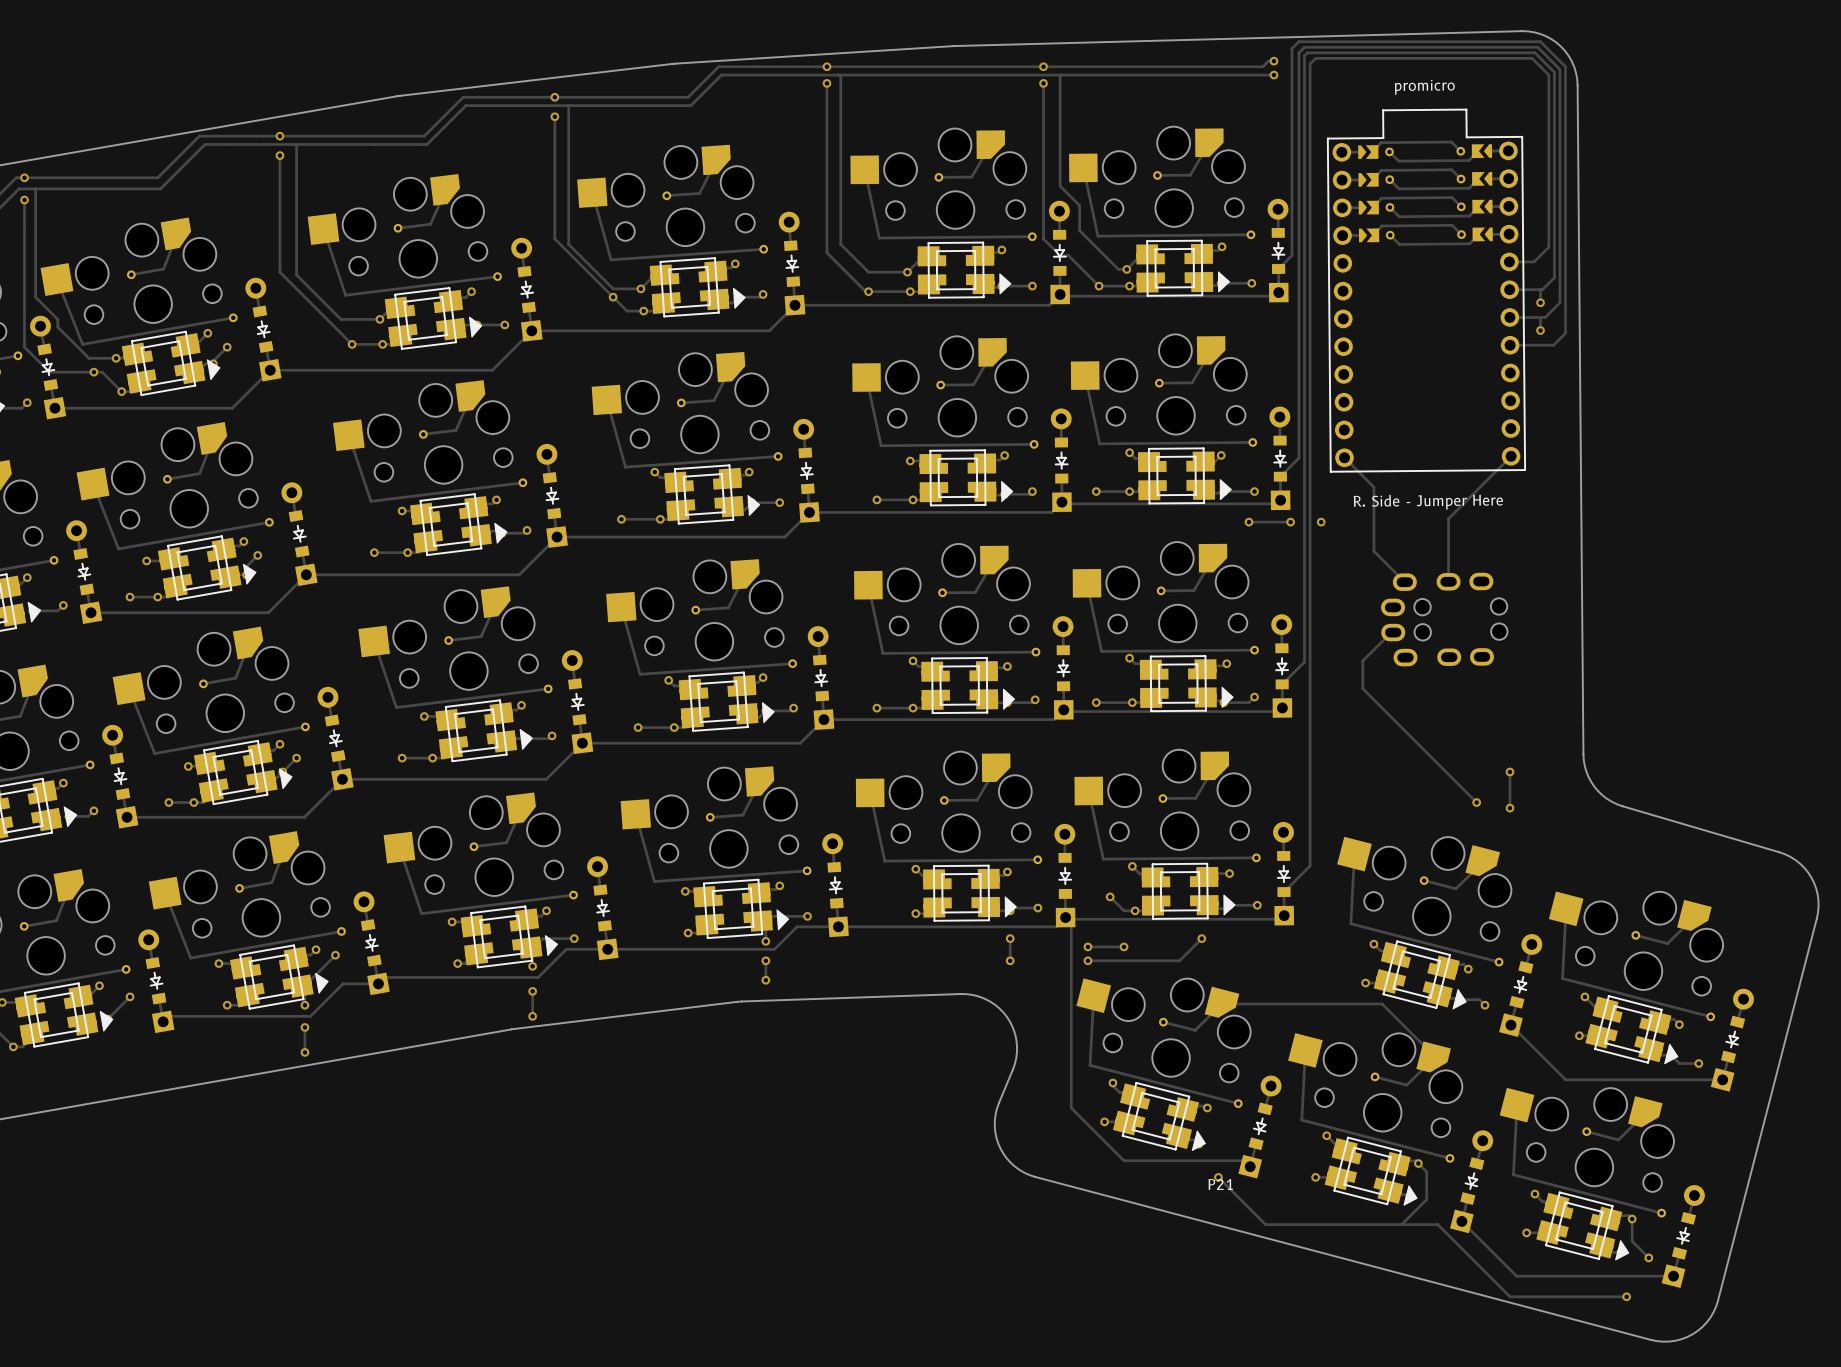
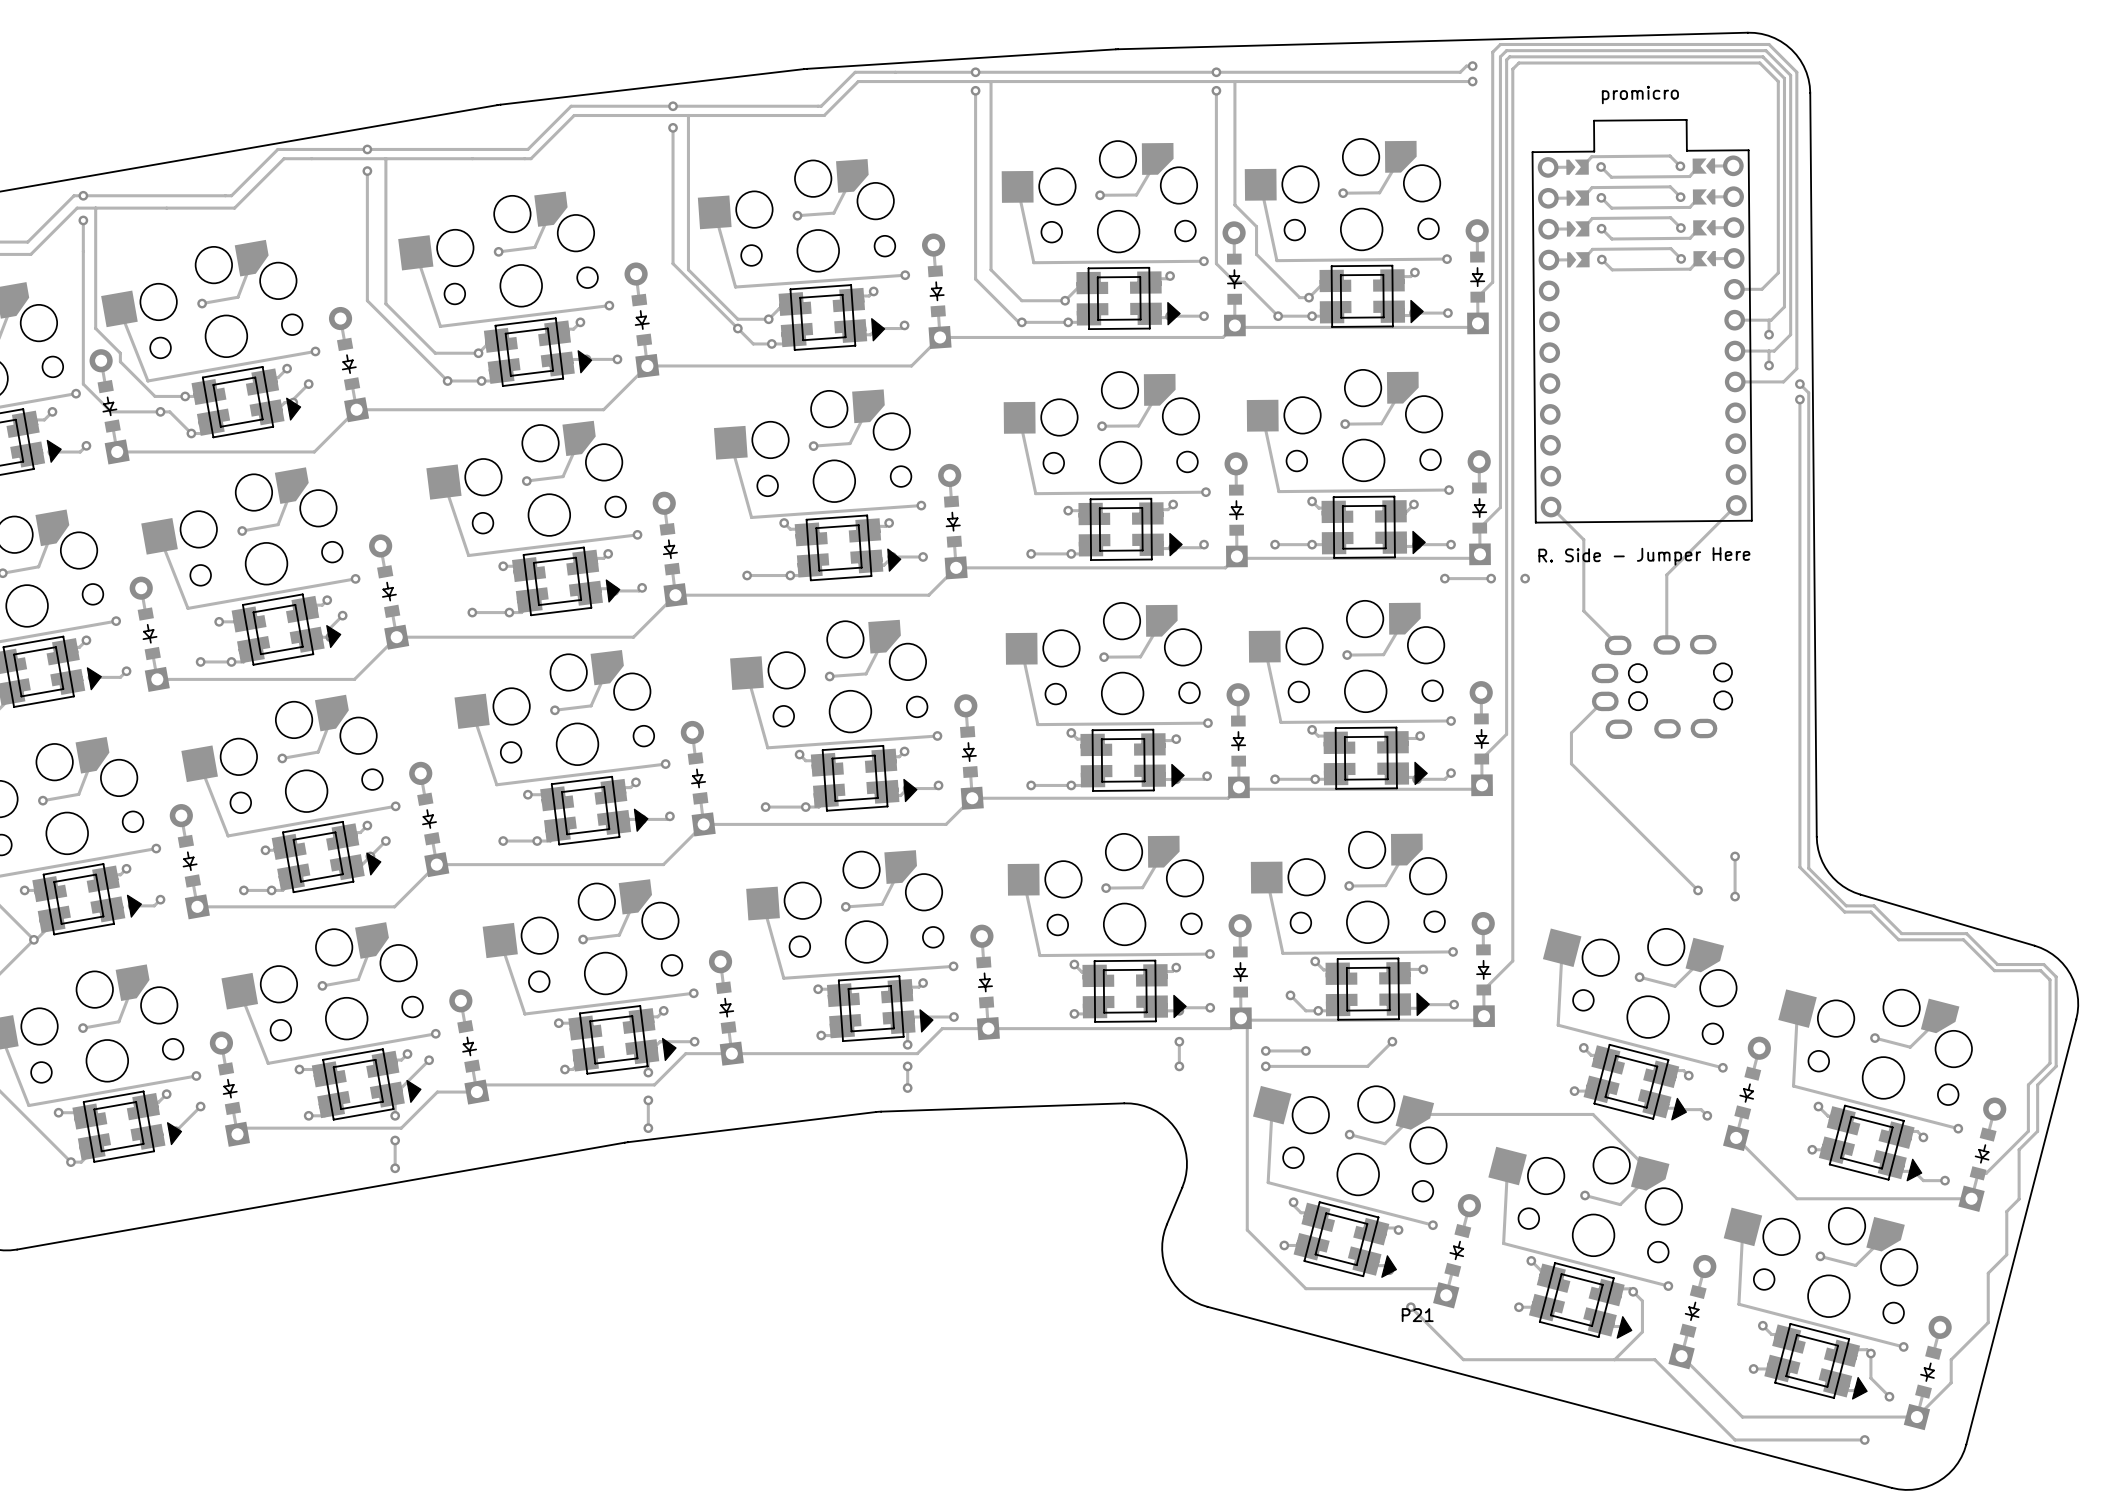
track: none -> (1799, 384) (1808, 392) (1808, 868) (1846, 905) (1874, 905) (1901, 933) (1966, 933) (1997, 964) (2043, 964) (2056, 976) (2056, 1066) (2037, 1084) (2037, 1131) (2019, 1149) (2019, 1199) (2006, 1211) (2006, 1254) (1988, 1273) (1988, 1322) (1951, 1359) (1951, 1382) (1916, 1417)
via: none -> (1799, 384)
track: none -> (1799, 399) (1799, 867) (1844, 912) (1870, 912) (1898, 939) (1963, 939) (1994, 970) (2040, 970) (2049, 979) (2049, 1063) (2028, 1084) (2028, 1131) (1986, 1173) (1978, 1173)
via: none -> (1799, 399)

